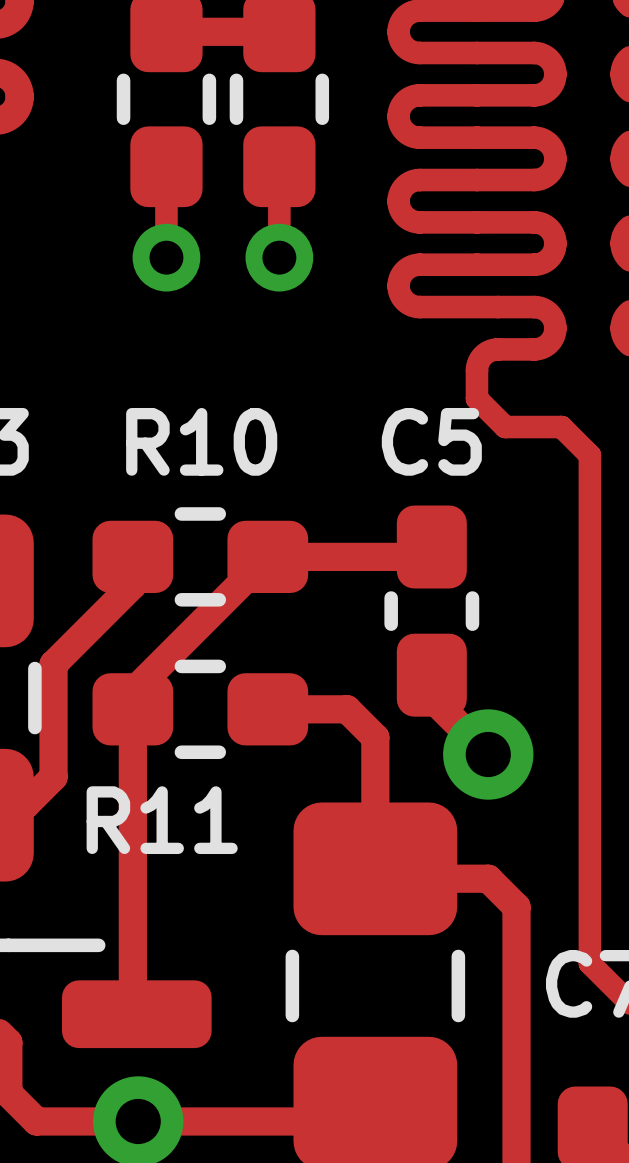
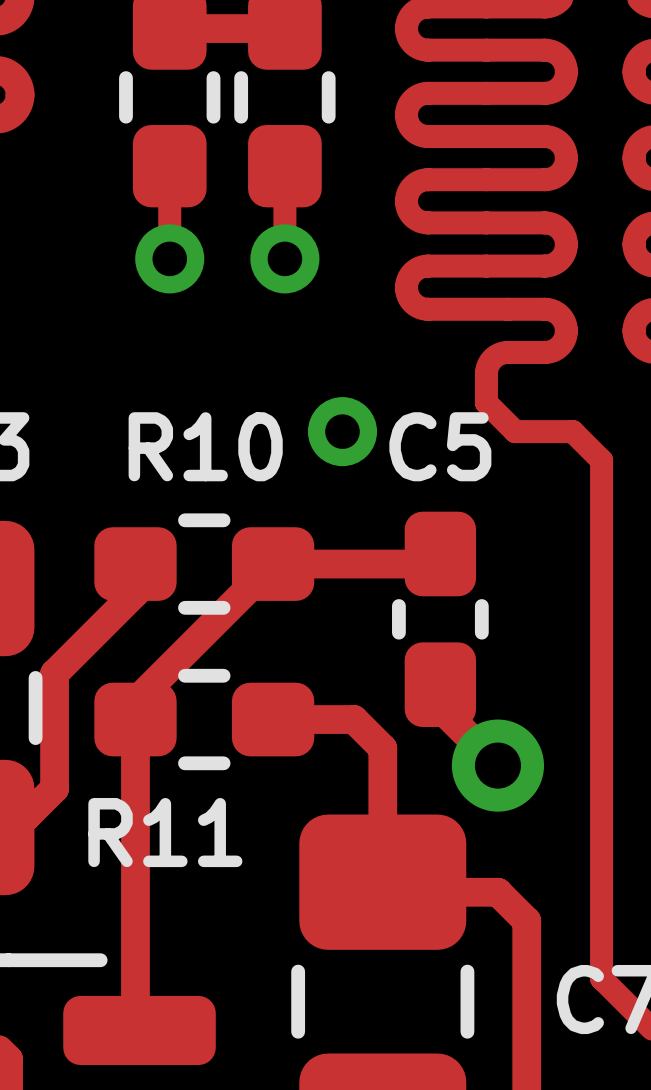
via: none -> (342, 431)

